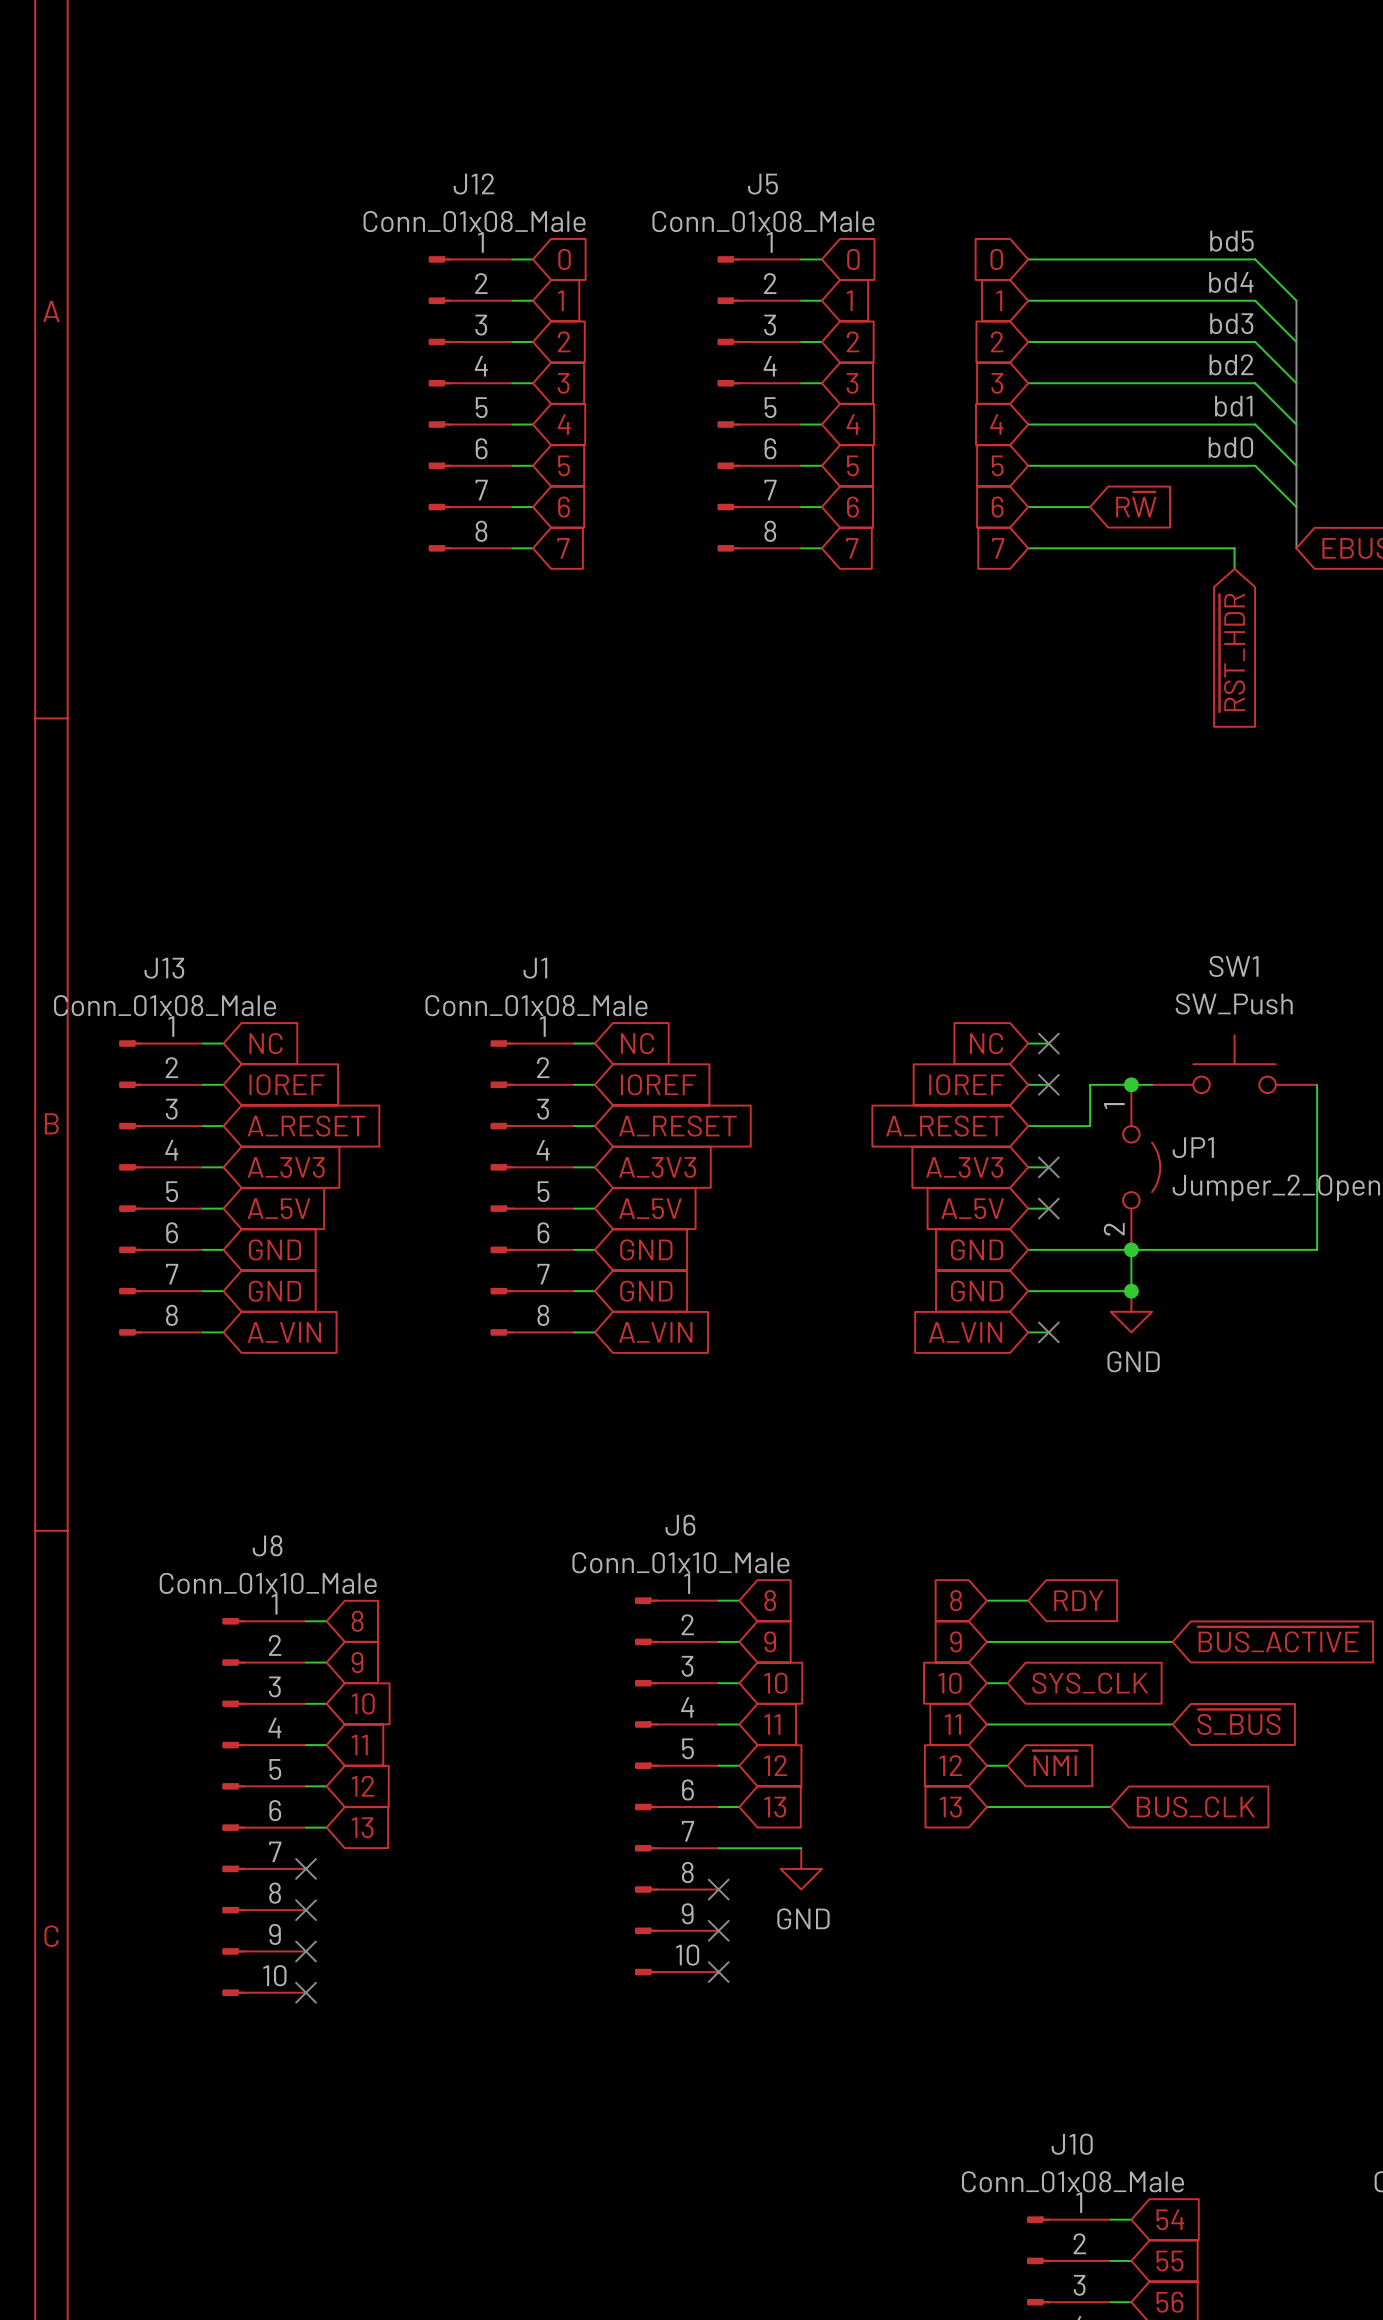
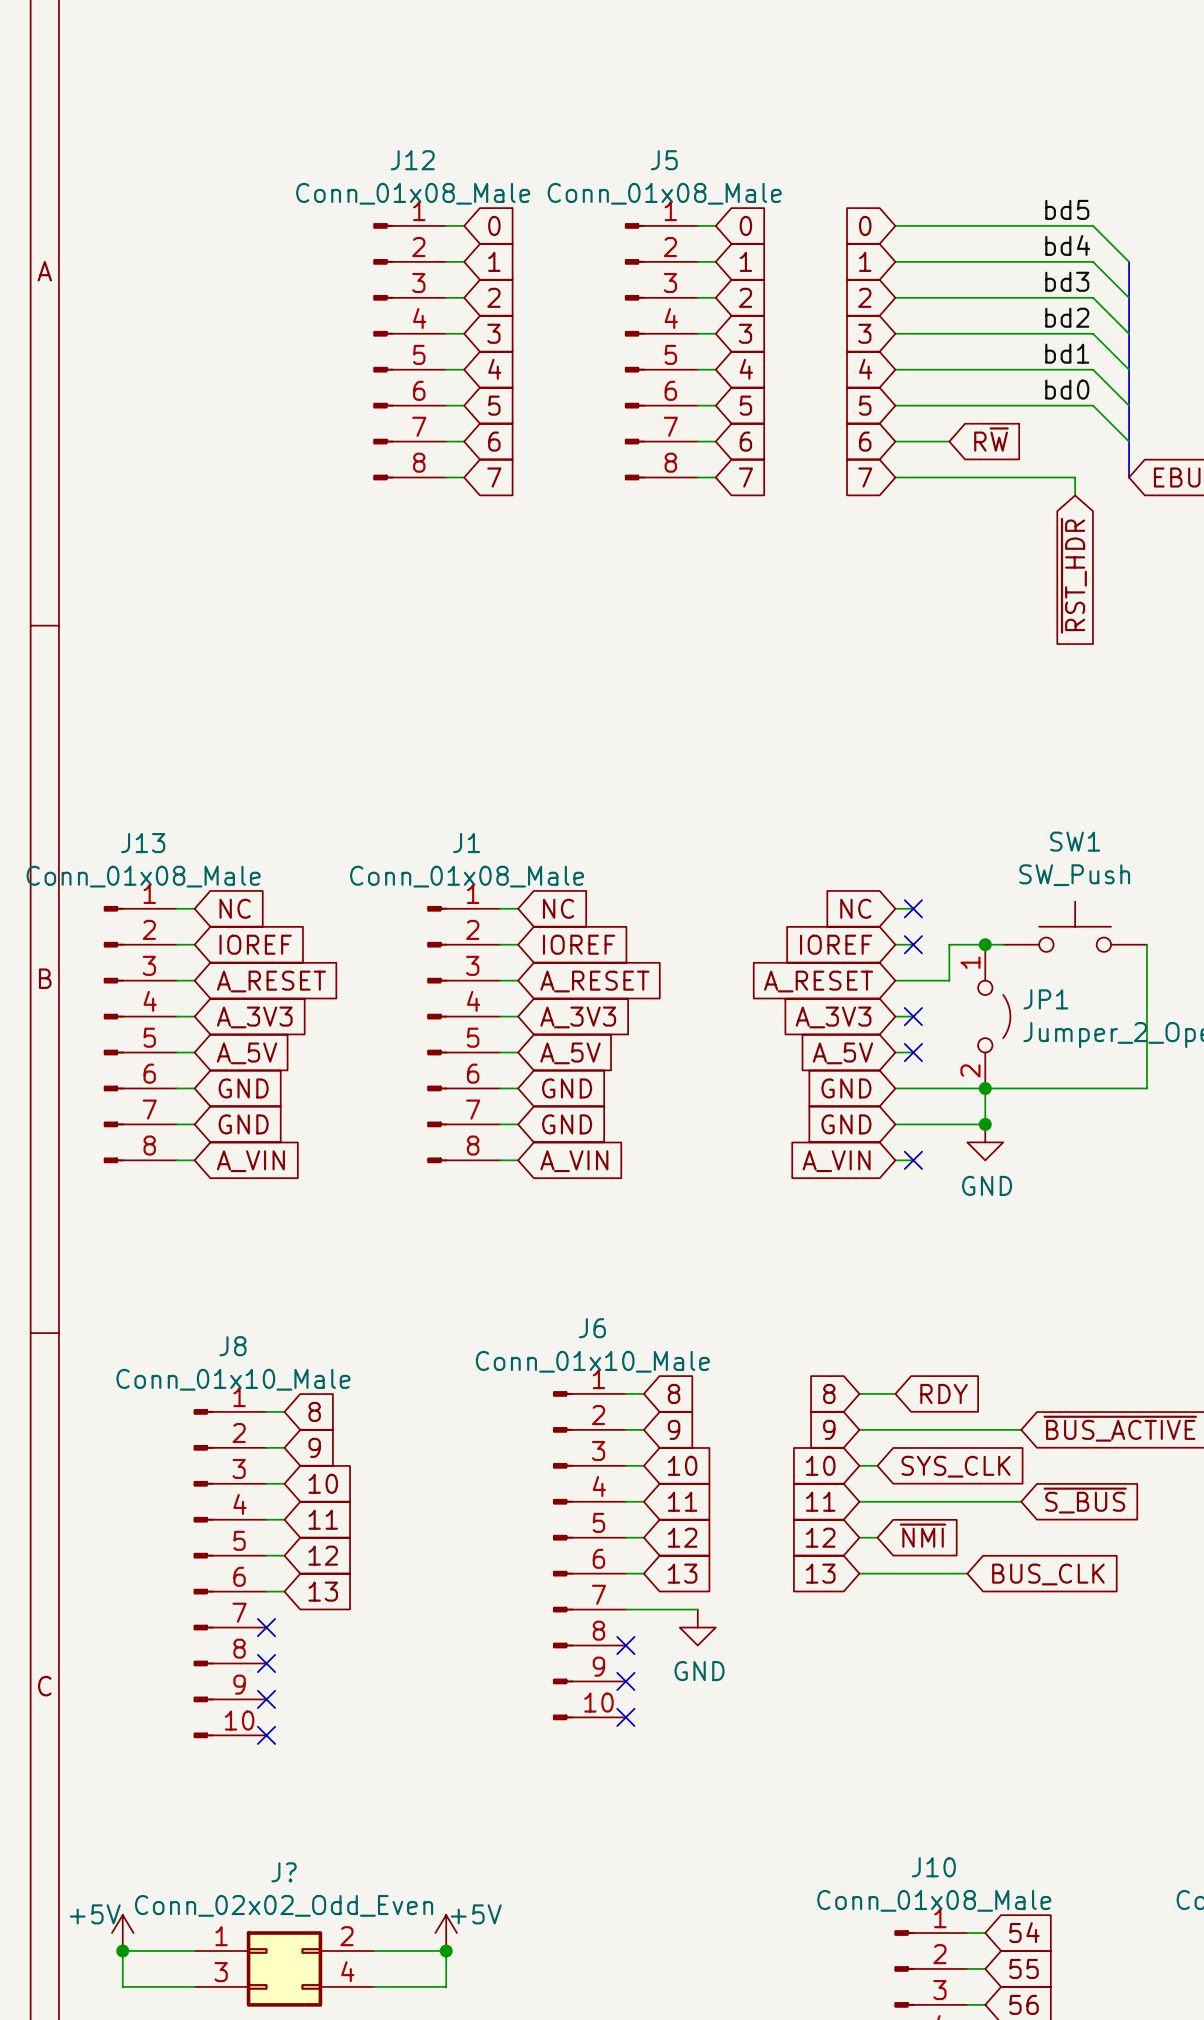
power symbol: none -> +5V (122, 1933)
power symbol: none -> +5V (446, 1933)
junction: none -> (122, 1950)
wire: none -> (194, 1950) (122, 1950) (122, 1986) (194, 1986)
wire: none -> (374, 1950) (446, 1950) (446, 1986) (374, 1986)
junction: none -> (446, 1950)
J?: none -> Conn_02x02_Odd_Even (284, 1968)

